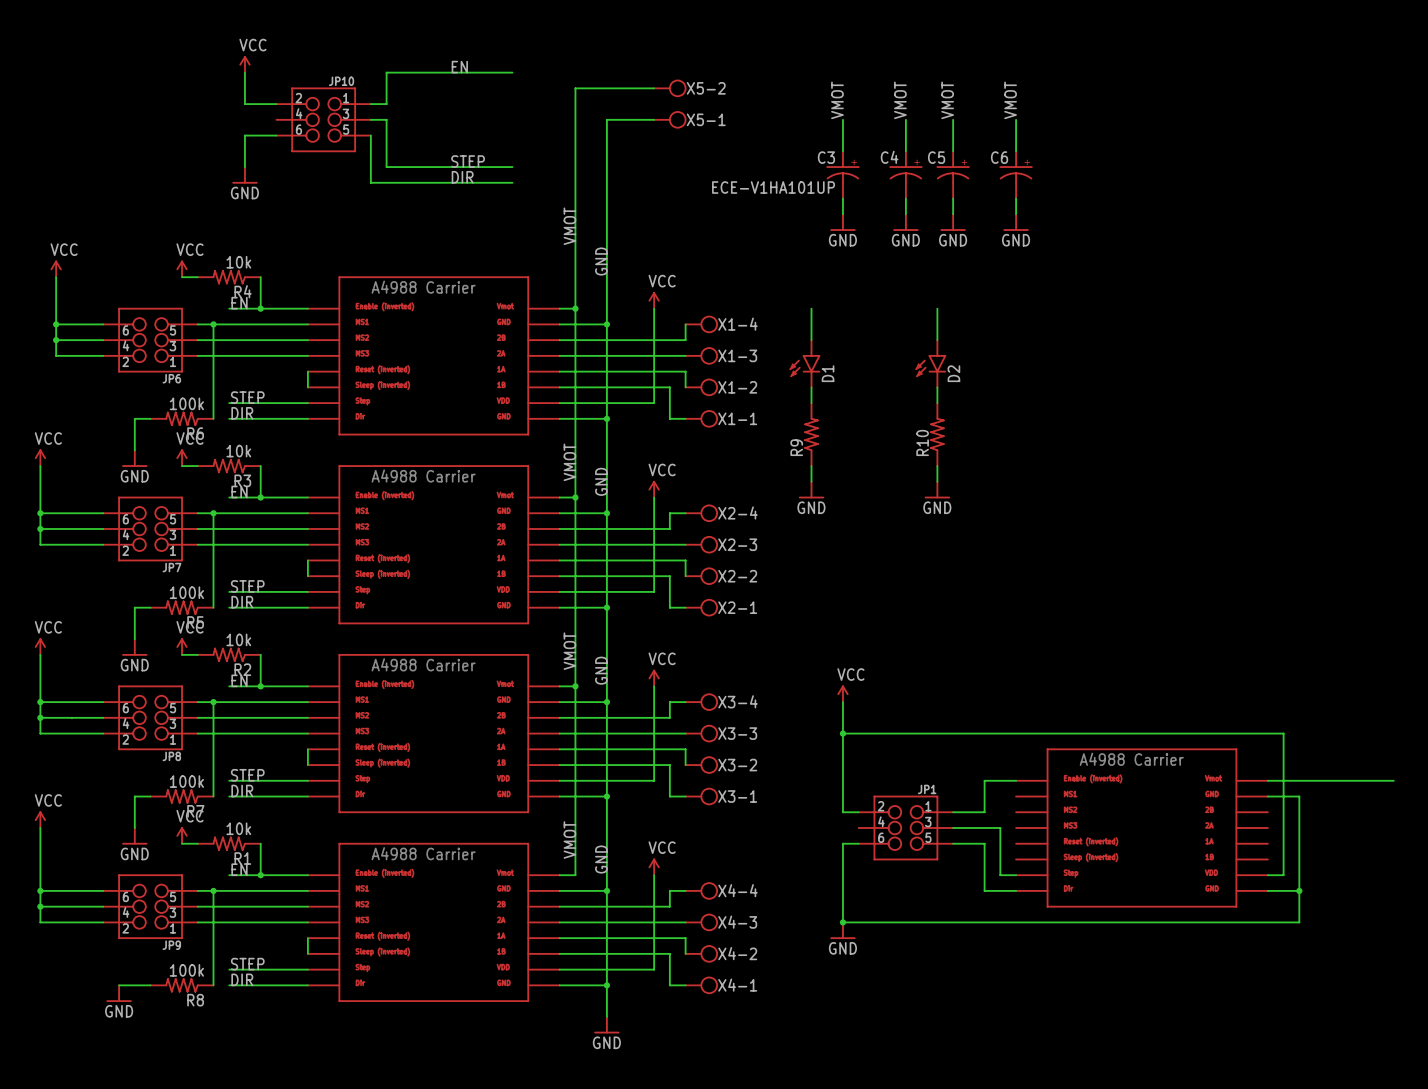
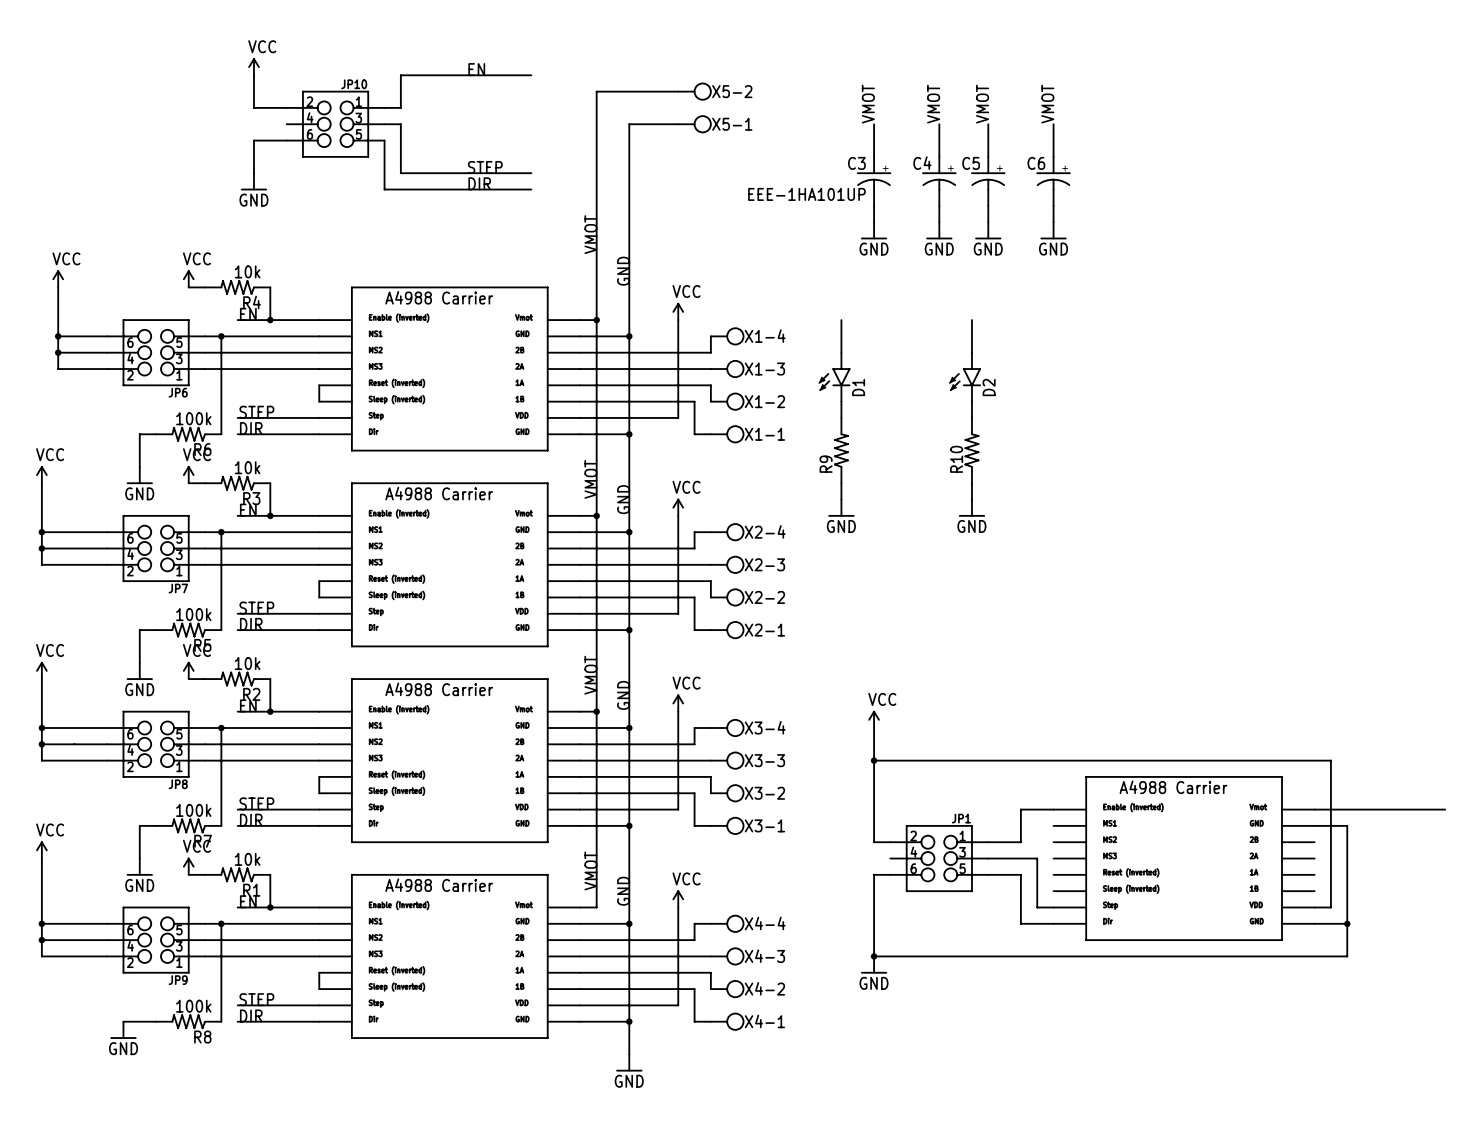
C3 value: ECE-V1HA101UP (773, 187) -> EEE-1HA101UP (806, 194)

